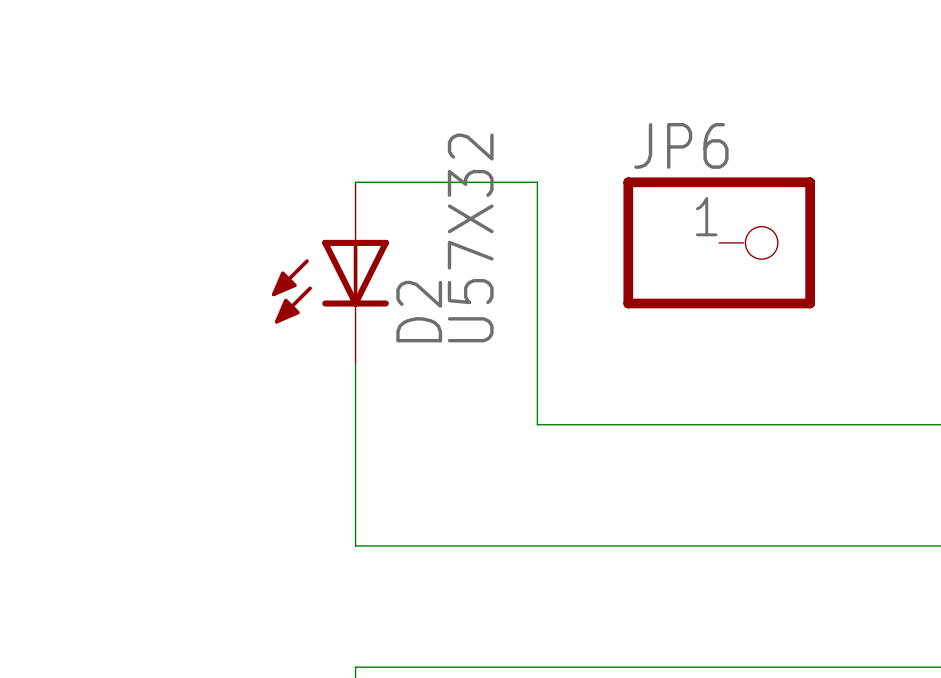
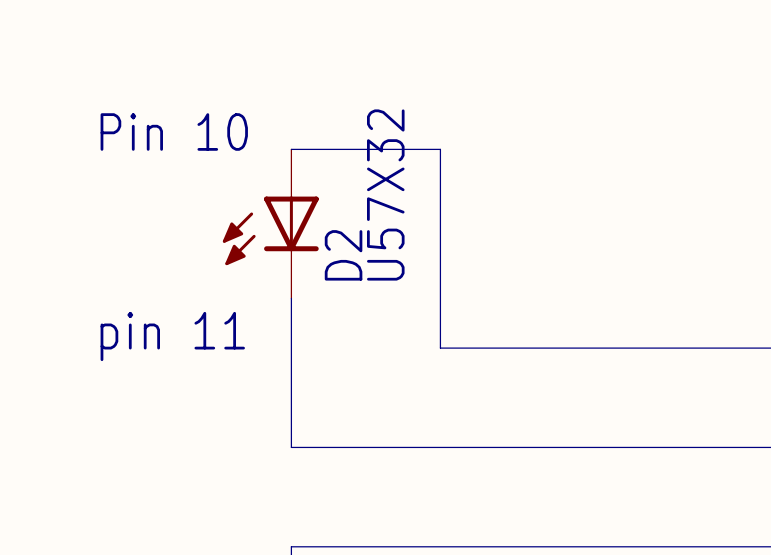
text: none -> Pin 10 (174, 132)
JP6: (719, 242) -> none
text: none -> pin 11 (172, 336)

